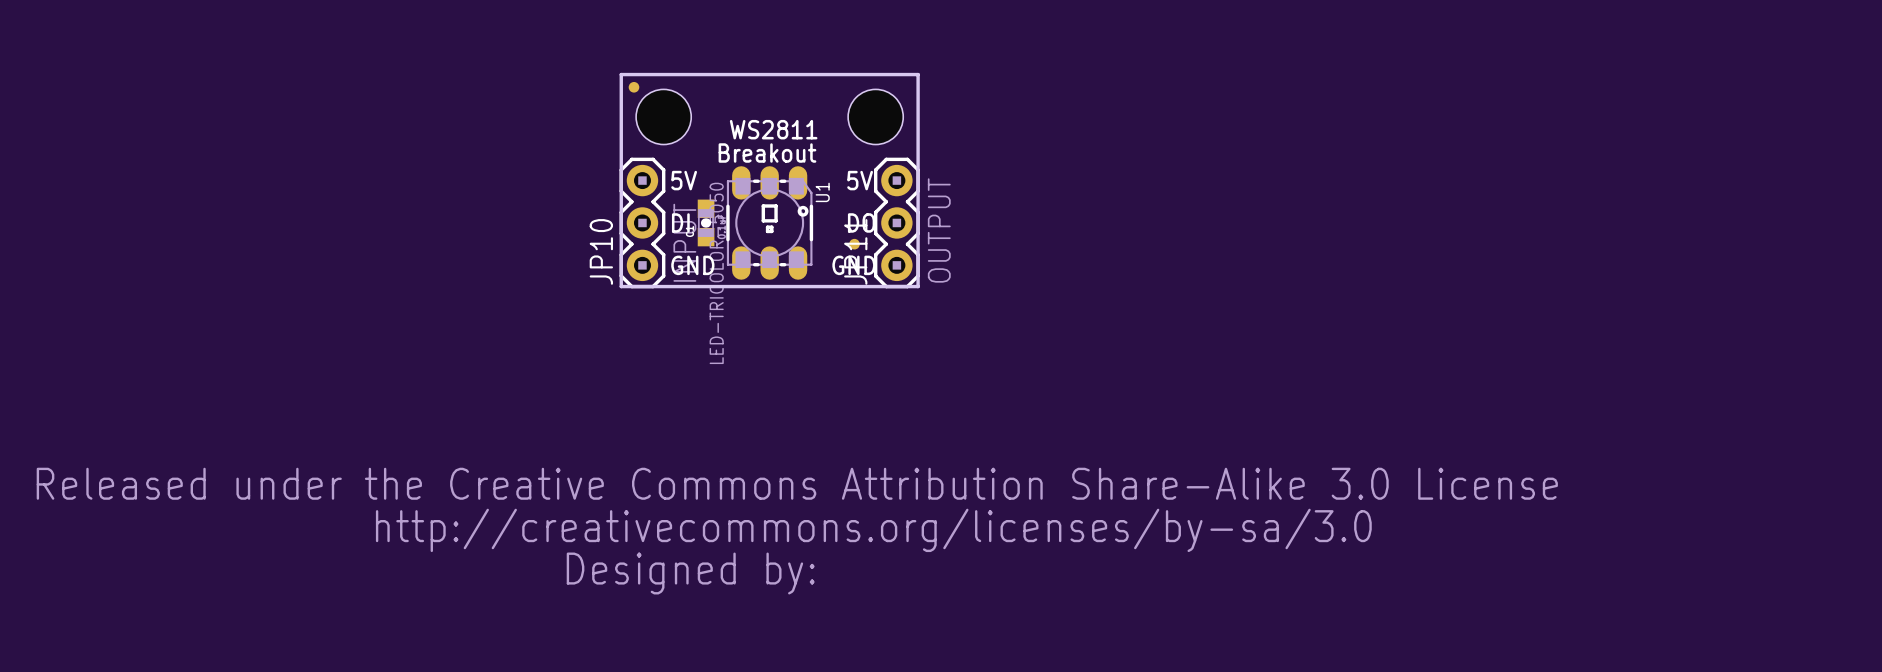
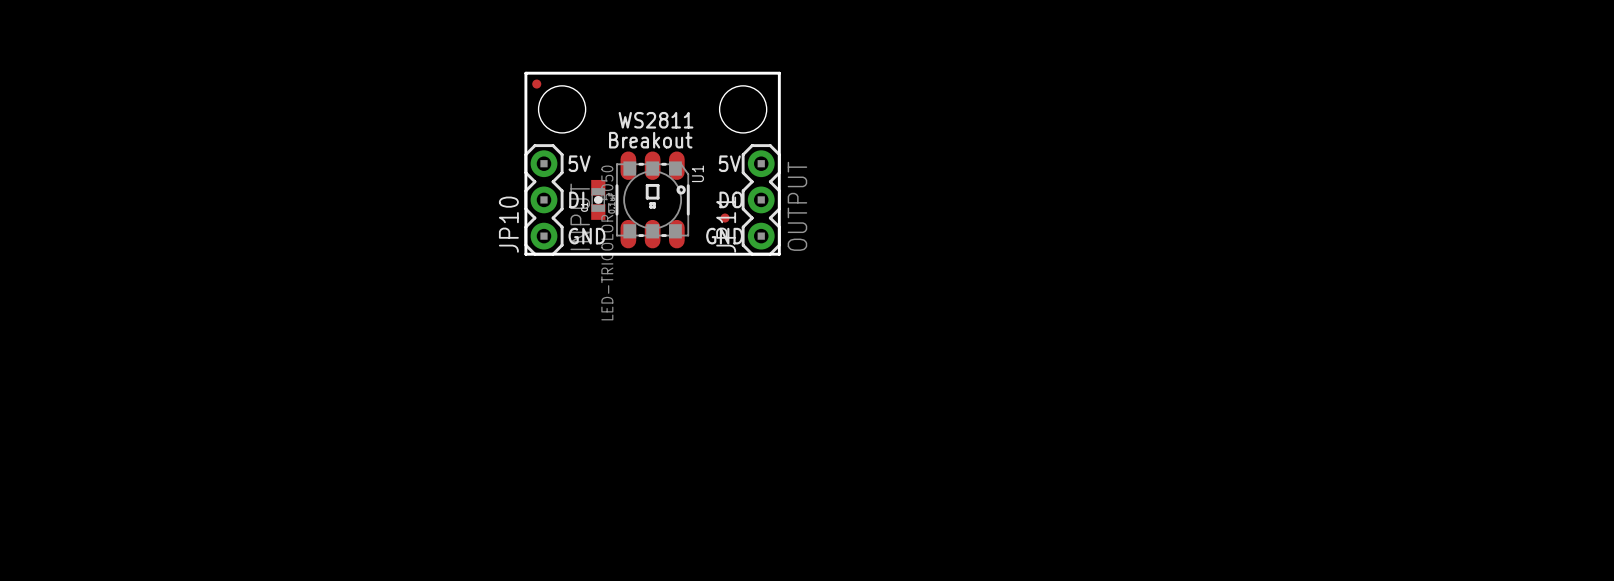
drawing: [36, 467, 1558, 595] -> none

